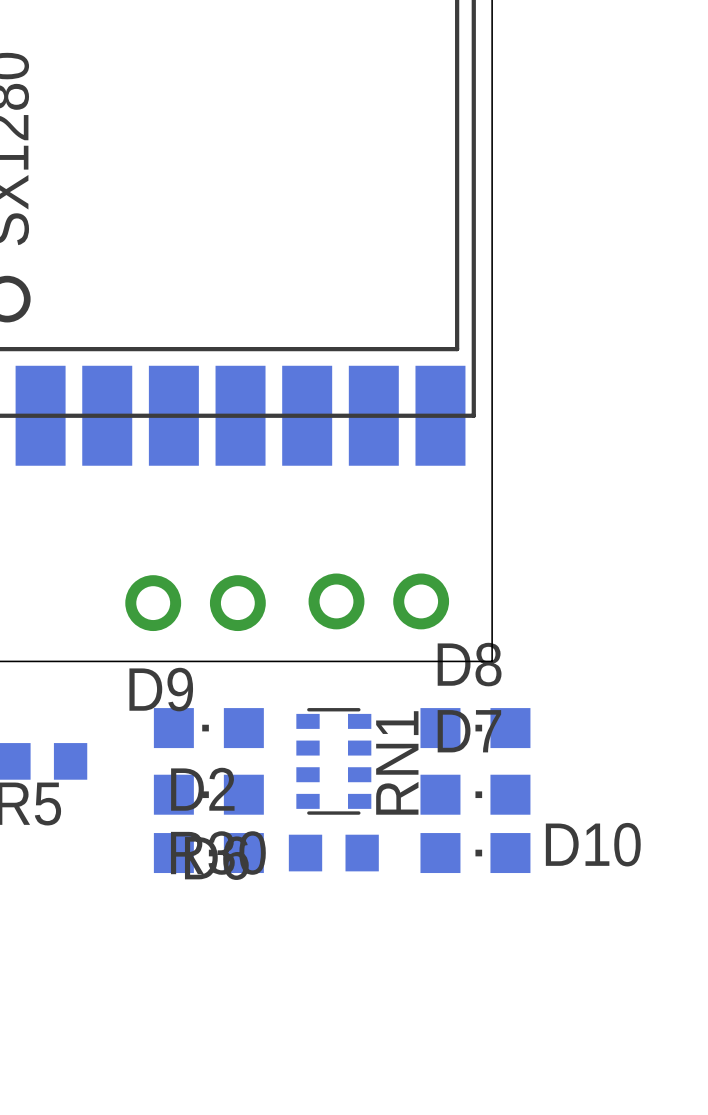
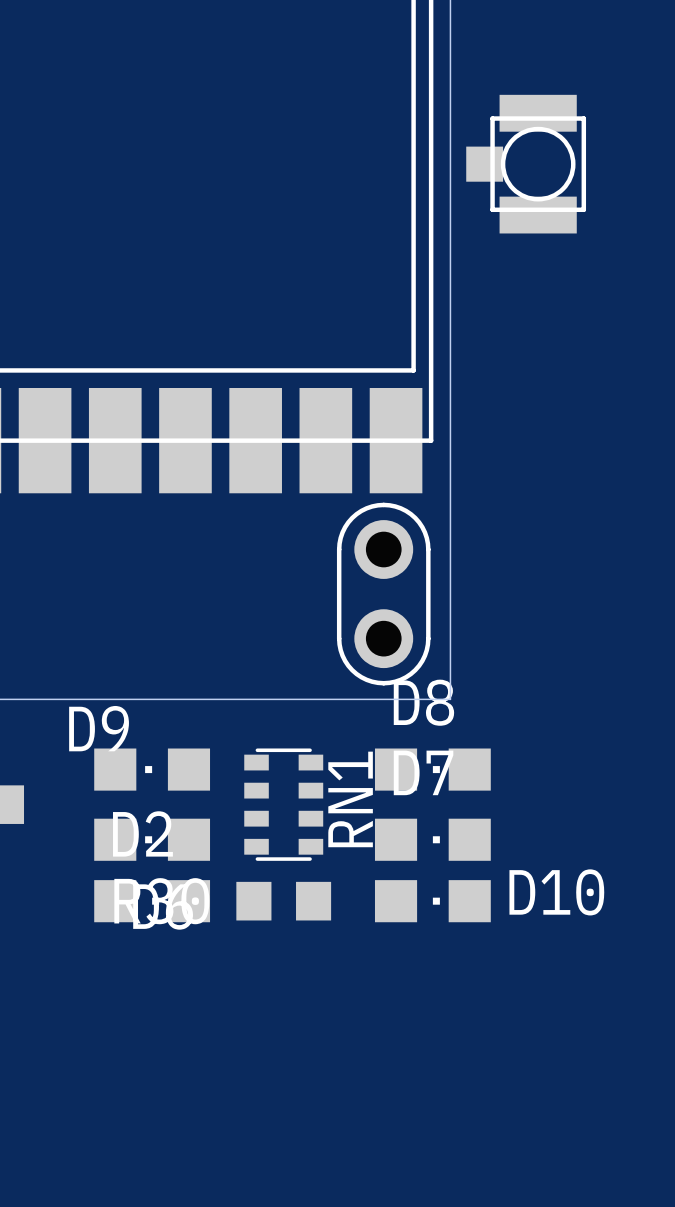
part: none -> (526, 164)
part: (378, 601) -> none
part side: top (195, 603) -> bottom (383, 594)

